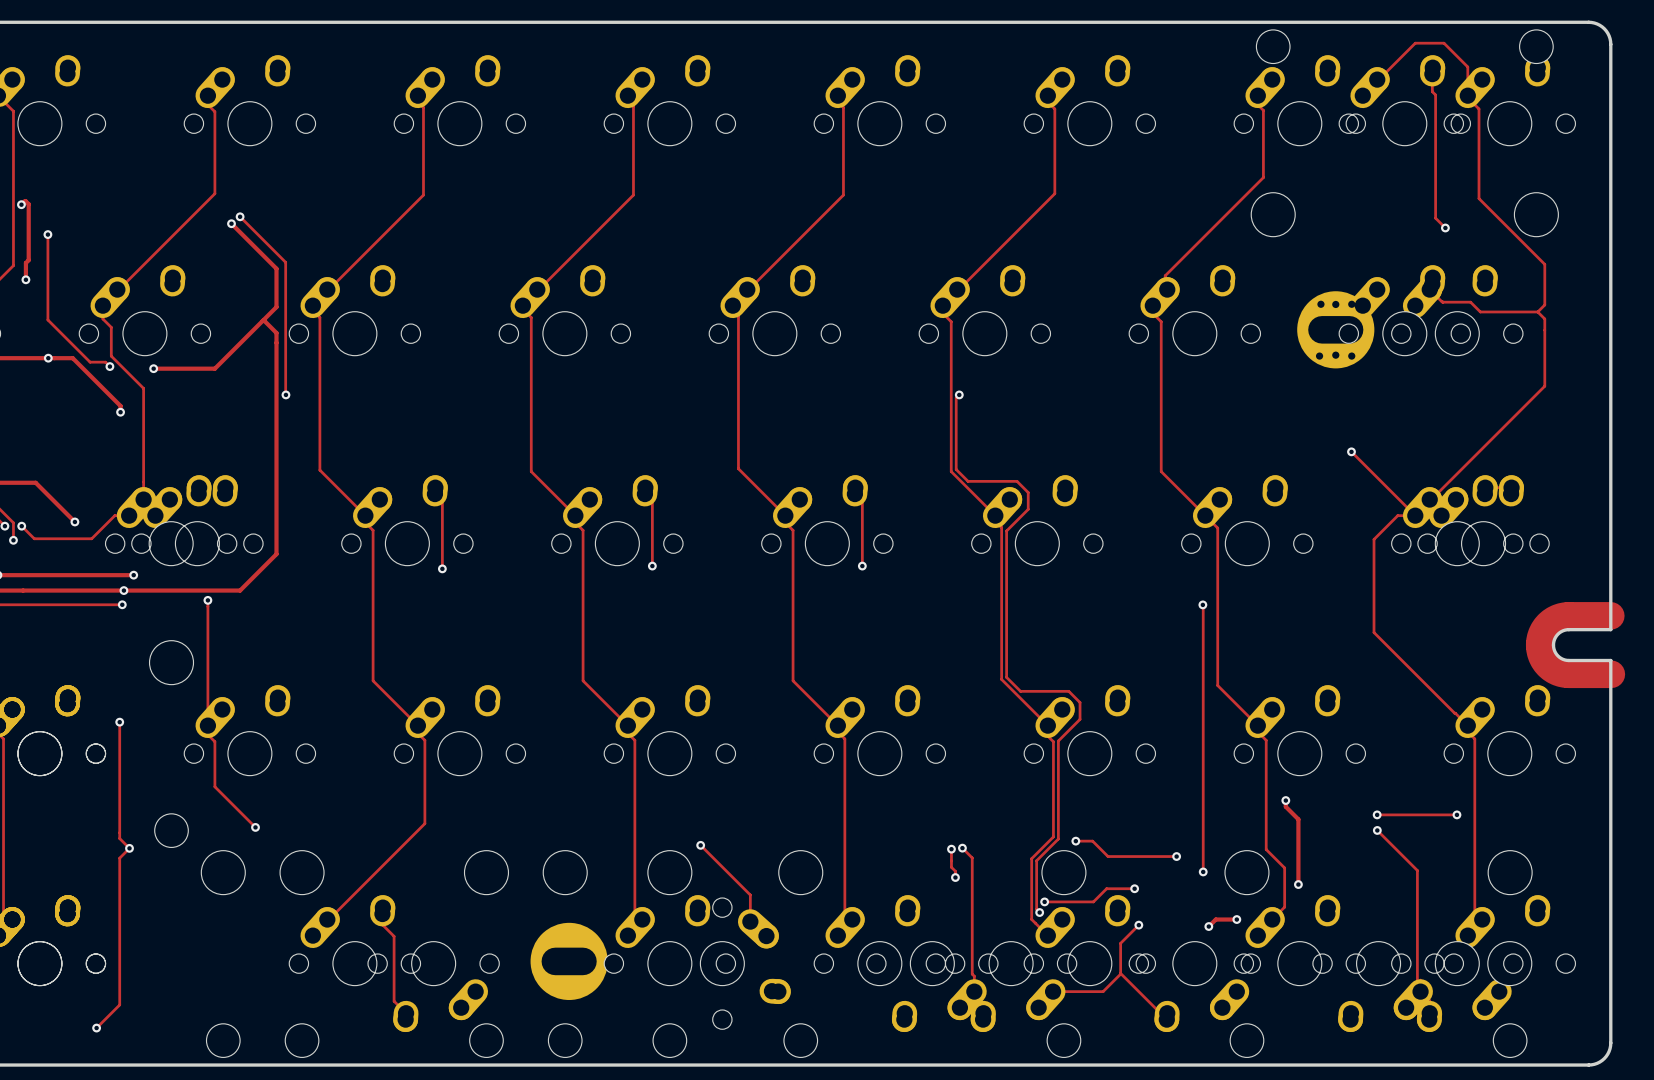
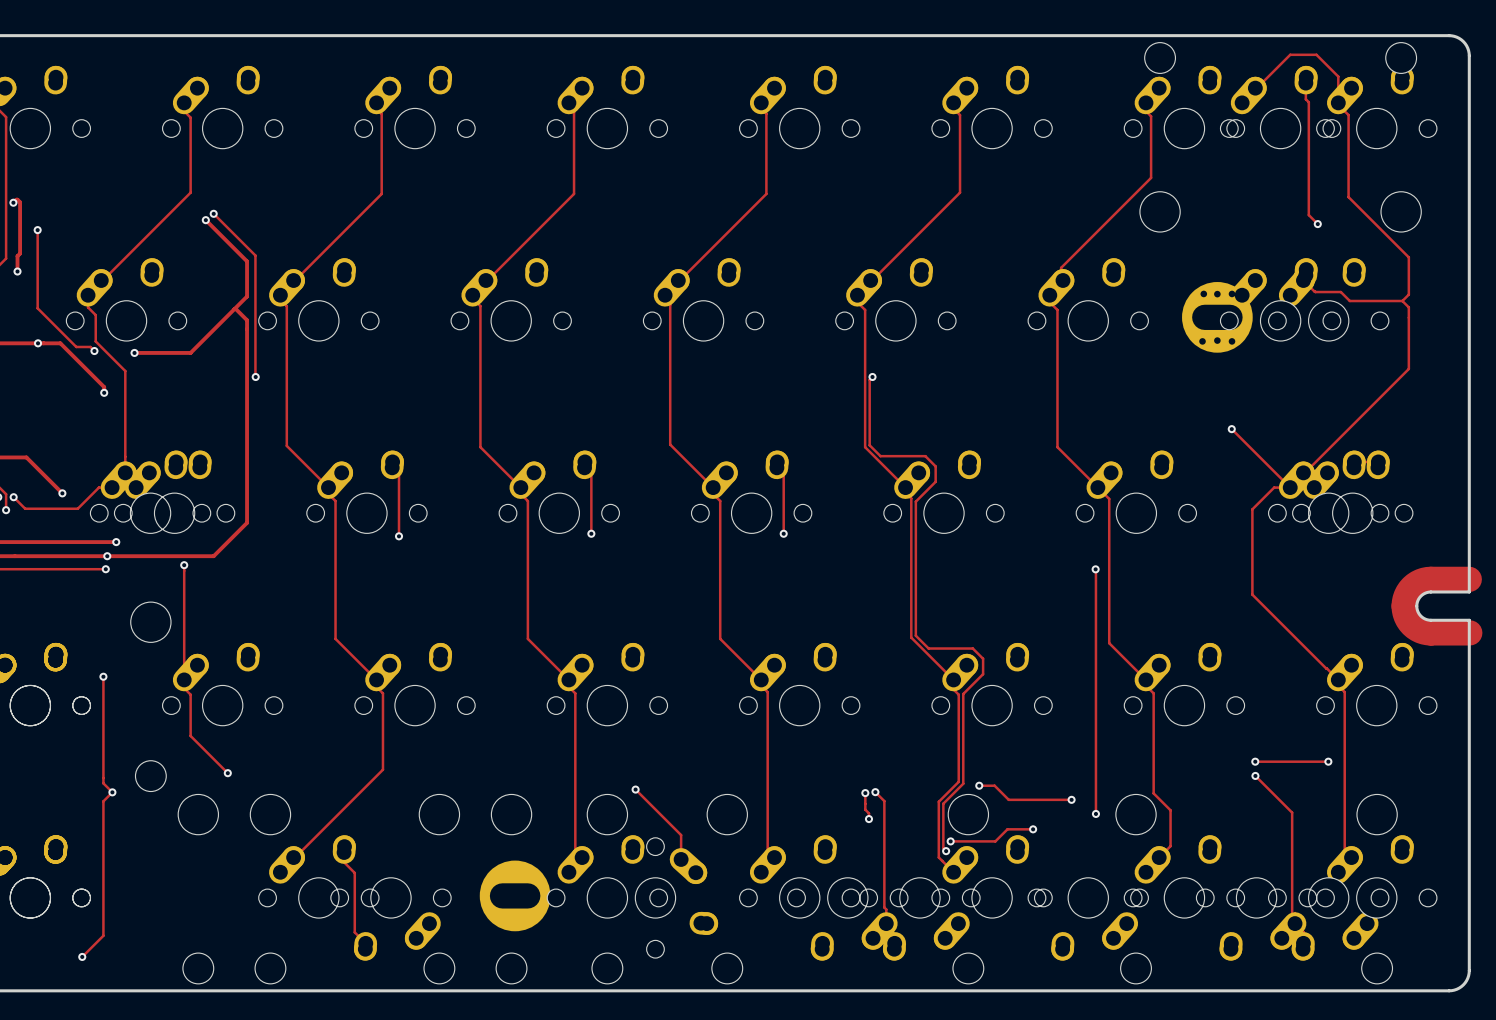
track: (1285, 800) (1285, 806) (1298, 819) (1298, 884) -> none
via: (1285, 800) -> none
via: (1298, 884) -> none
track: (1236, 919) (1215, 919) (1208, 926) -> none
via: (1236, 919) -> none
track: (1138, 925) (1120, 943) (1120, 974) (1103, 991) (1053, 991) -> none
via: (1138, 925) -> none
via: (1208, 926) -> none
track: (1120, 973) (1160, 1013) (1167, 1013) -> none

